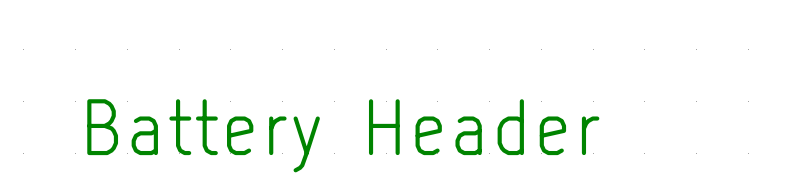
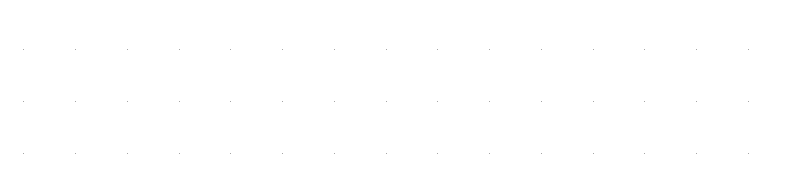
text: Battery Header (343, 135) -> none

